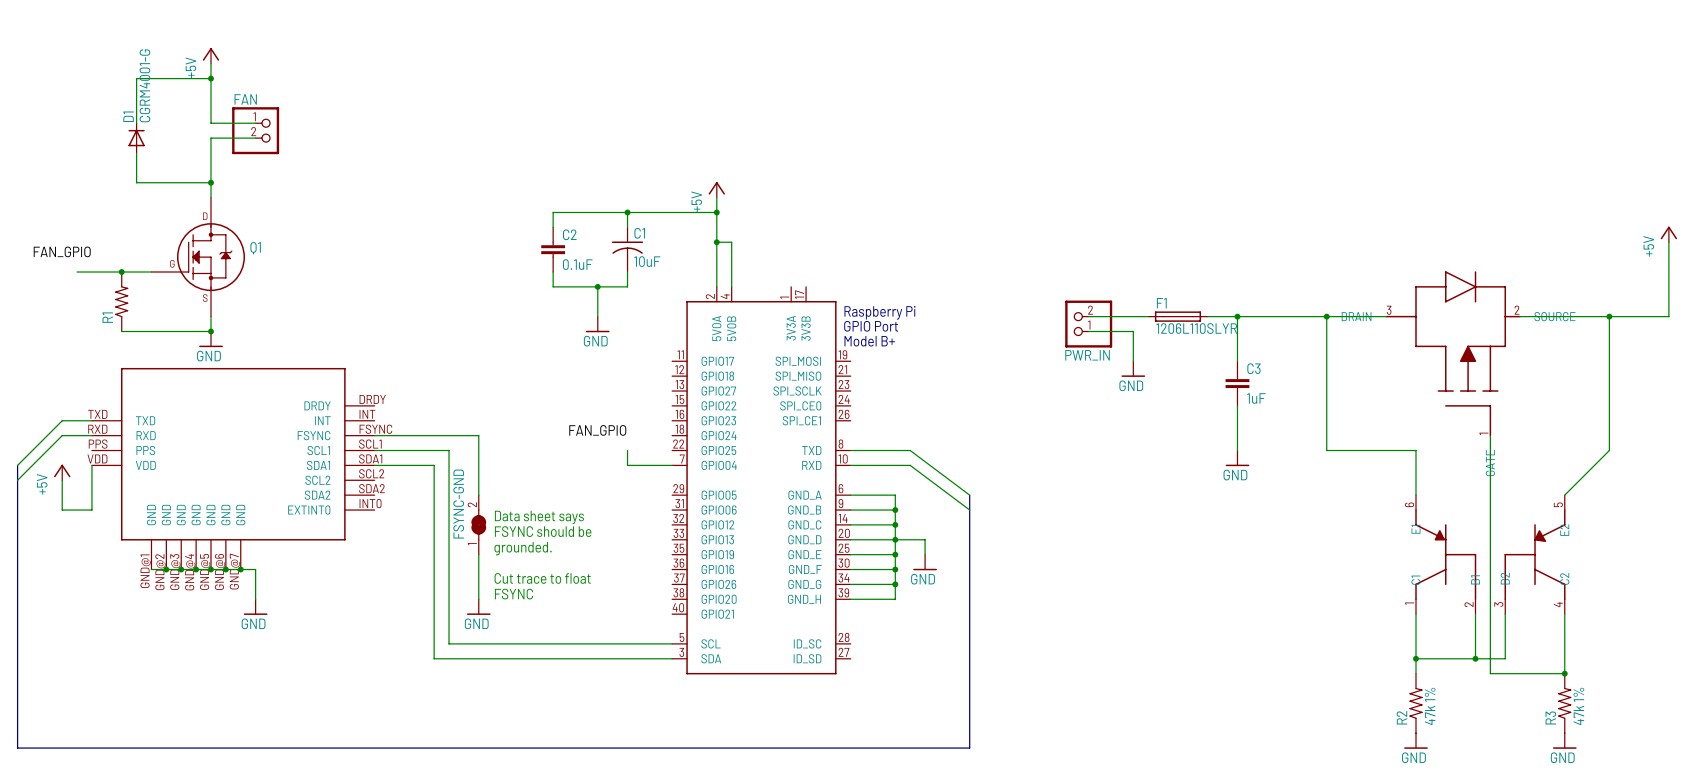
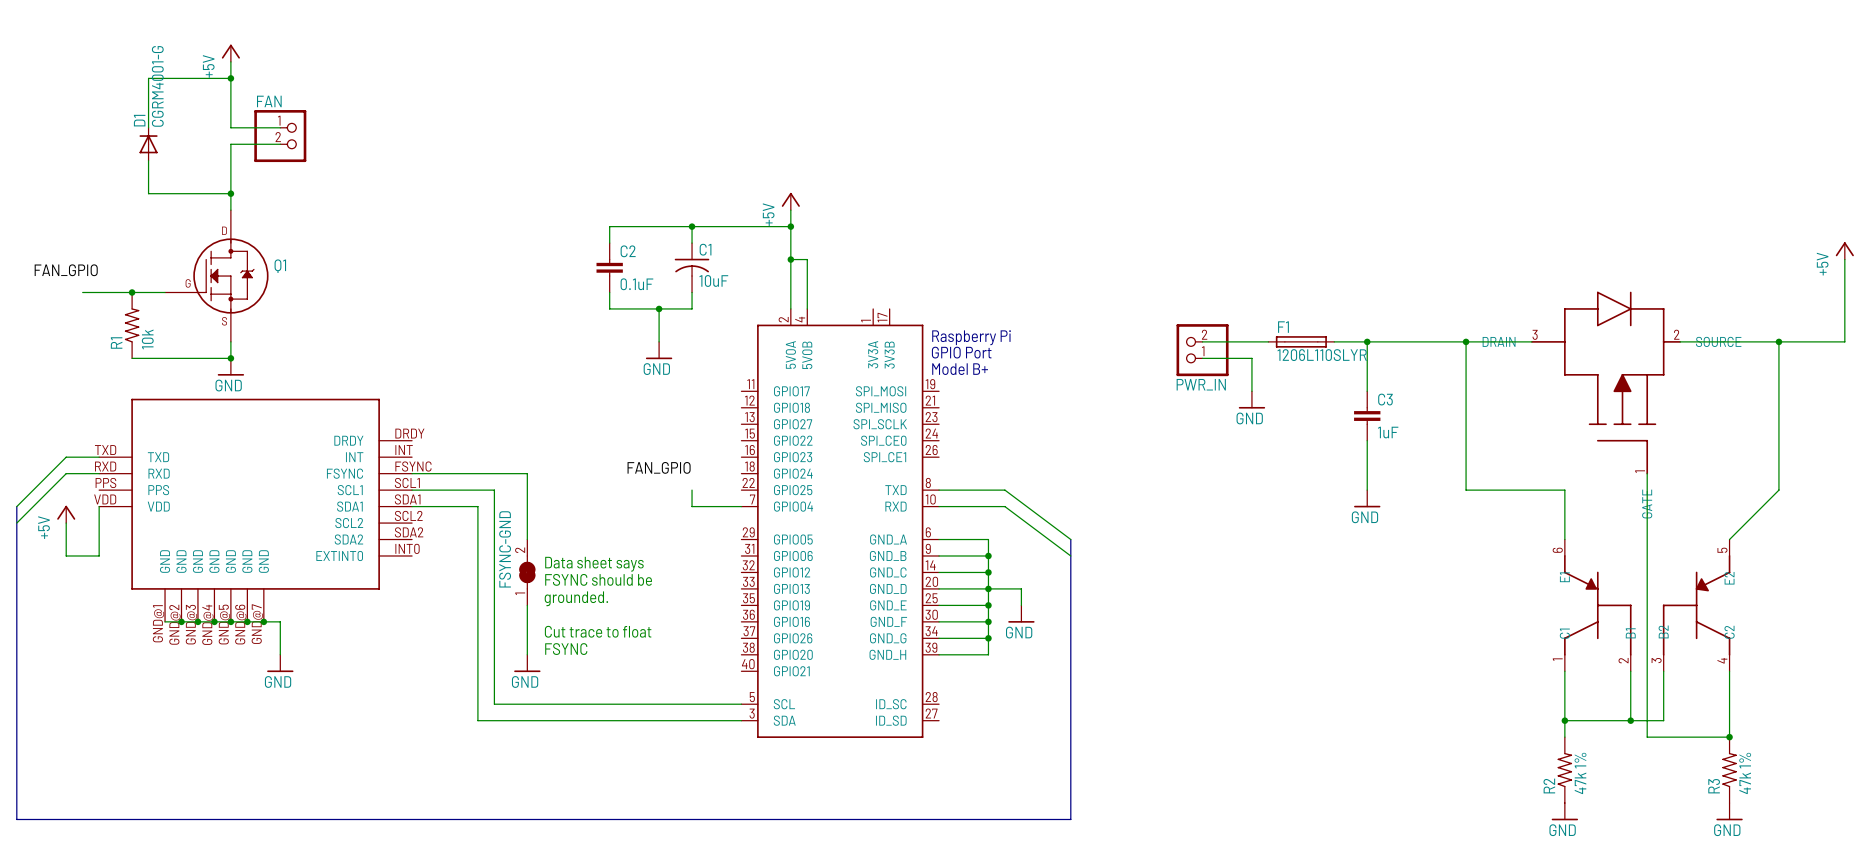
R1 value: none -> 10k (147, 339)

